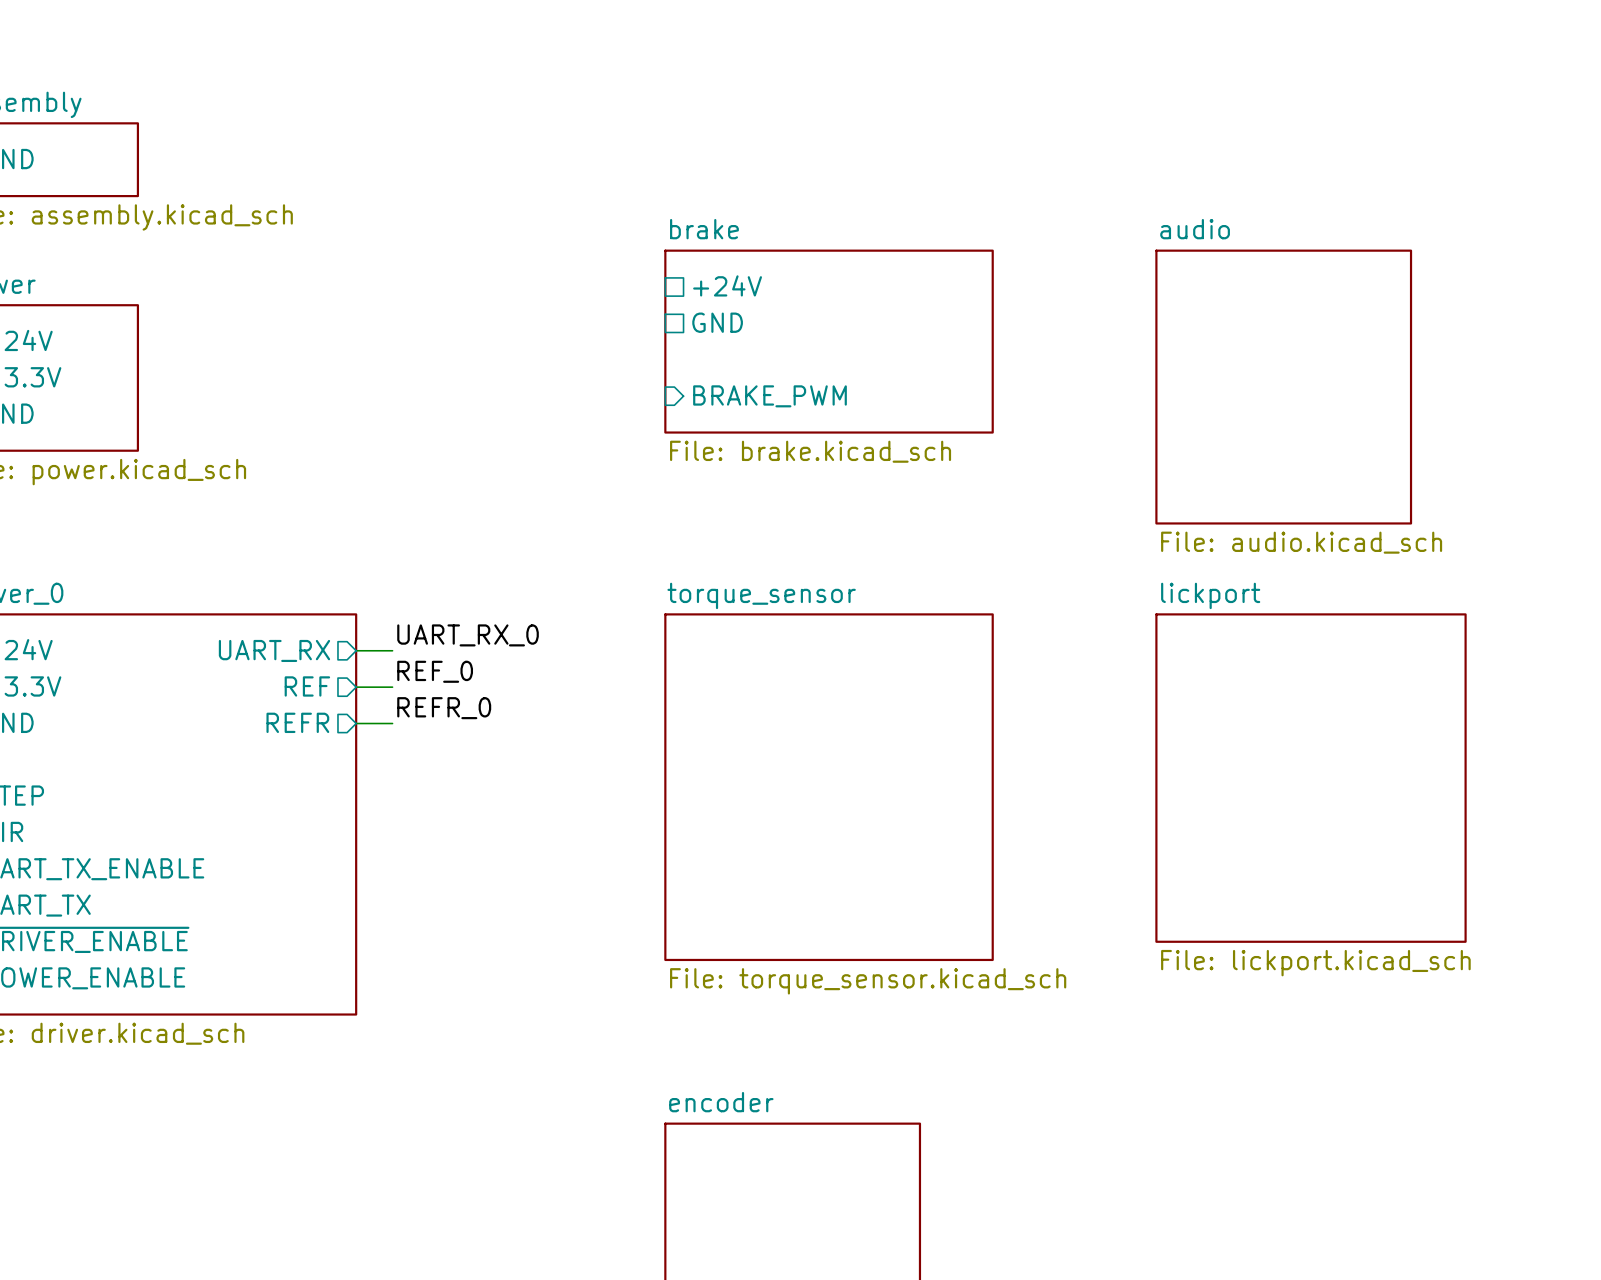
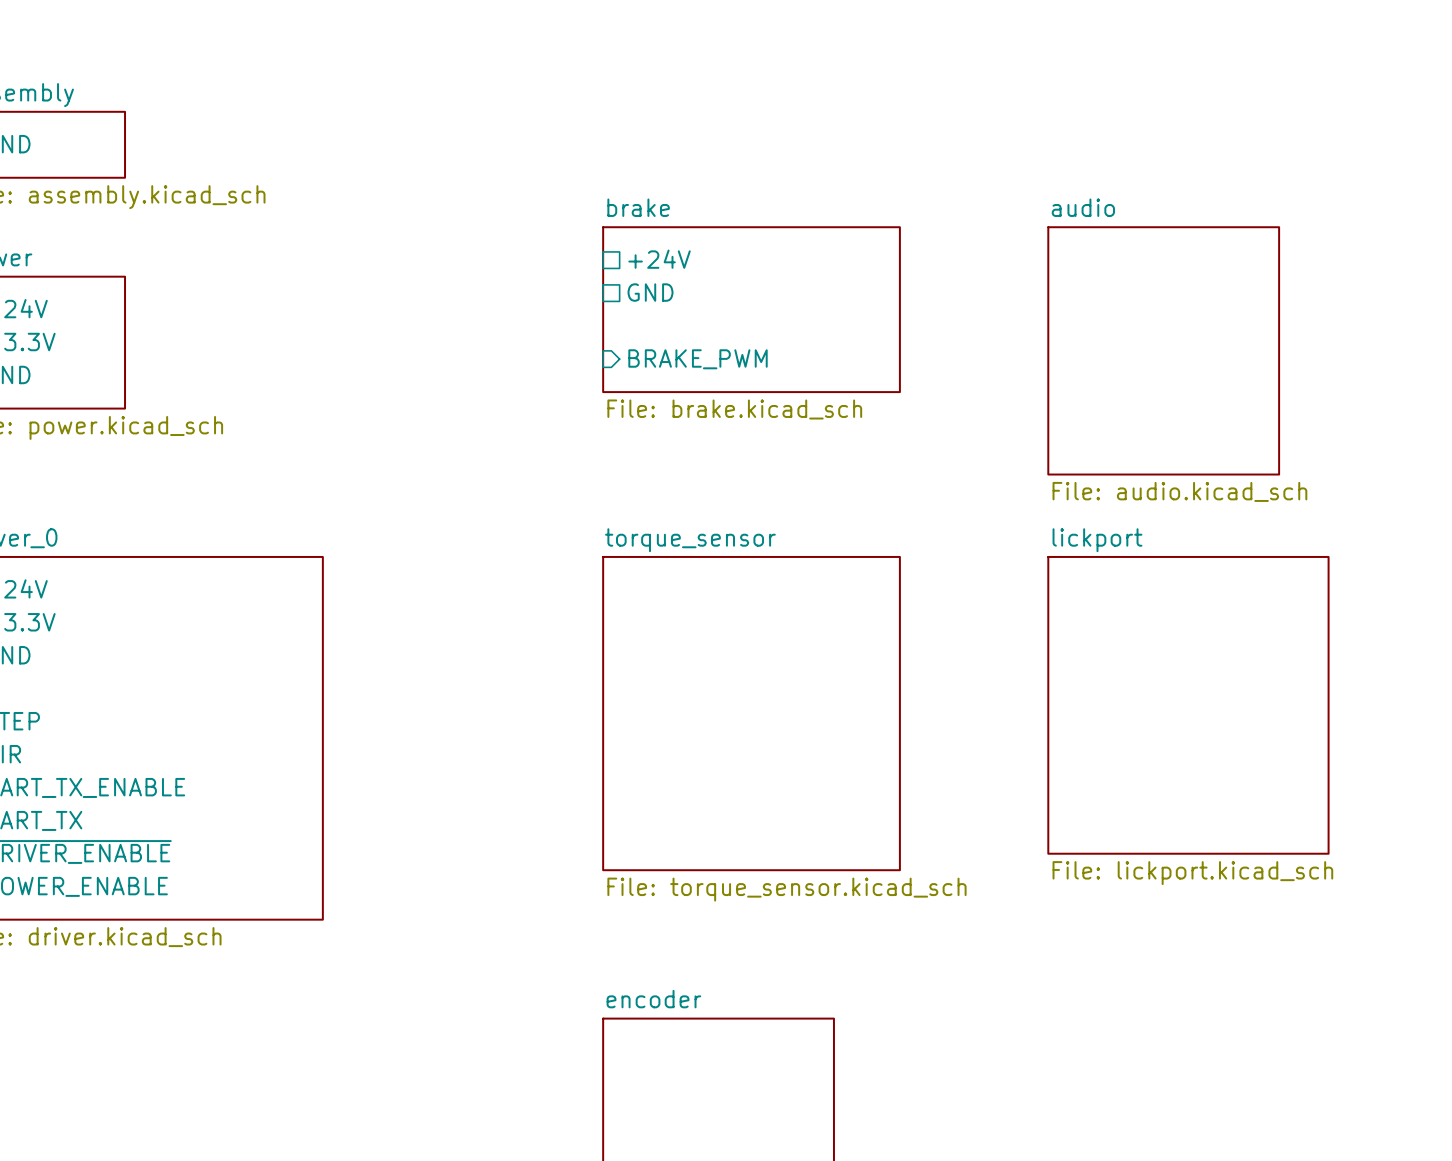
label: UART_RX_0 (468, 635) -> none
sheet pin: UART_RX (274, 650) -> none
wire: (356, 650) (392, 650) -> none
label: REF_0 (435, 671) -> none
sheet pin: REF (307, 686) -> none
wire: (356, 687) (392, 687) -> none
label: REFR_0 (444, 708) -> none
sheet pin: REFR (297, 722) -> none
wire: (356, 723) (392, 723) -> none

